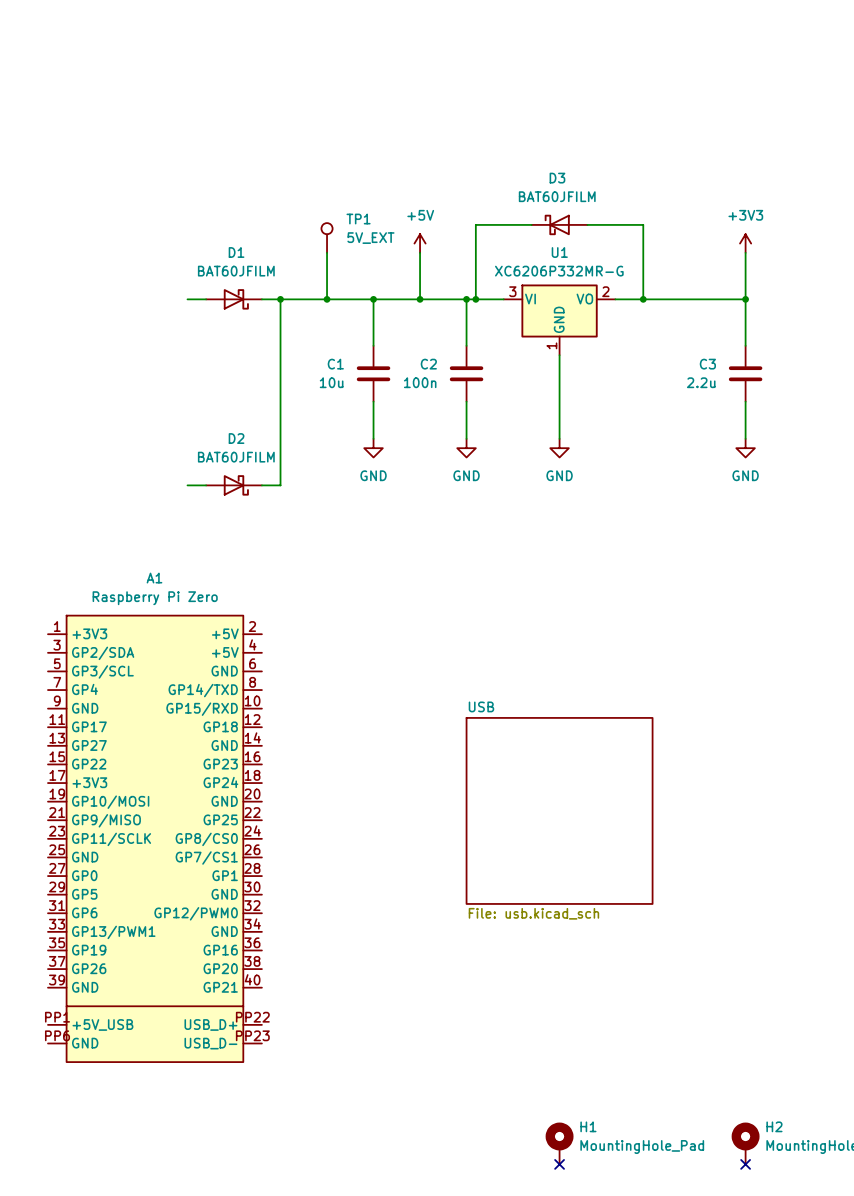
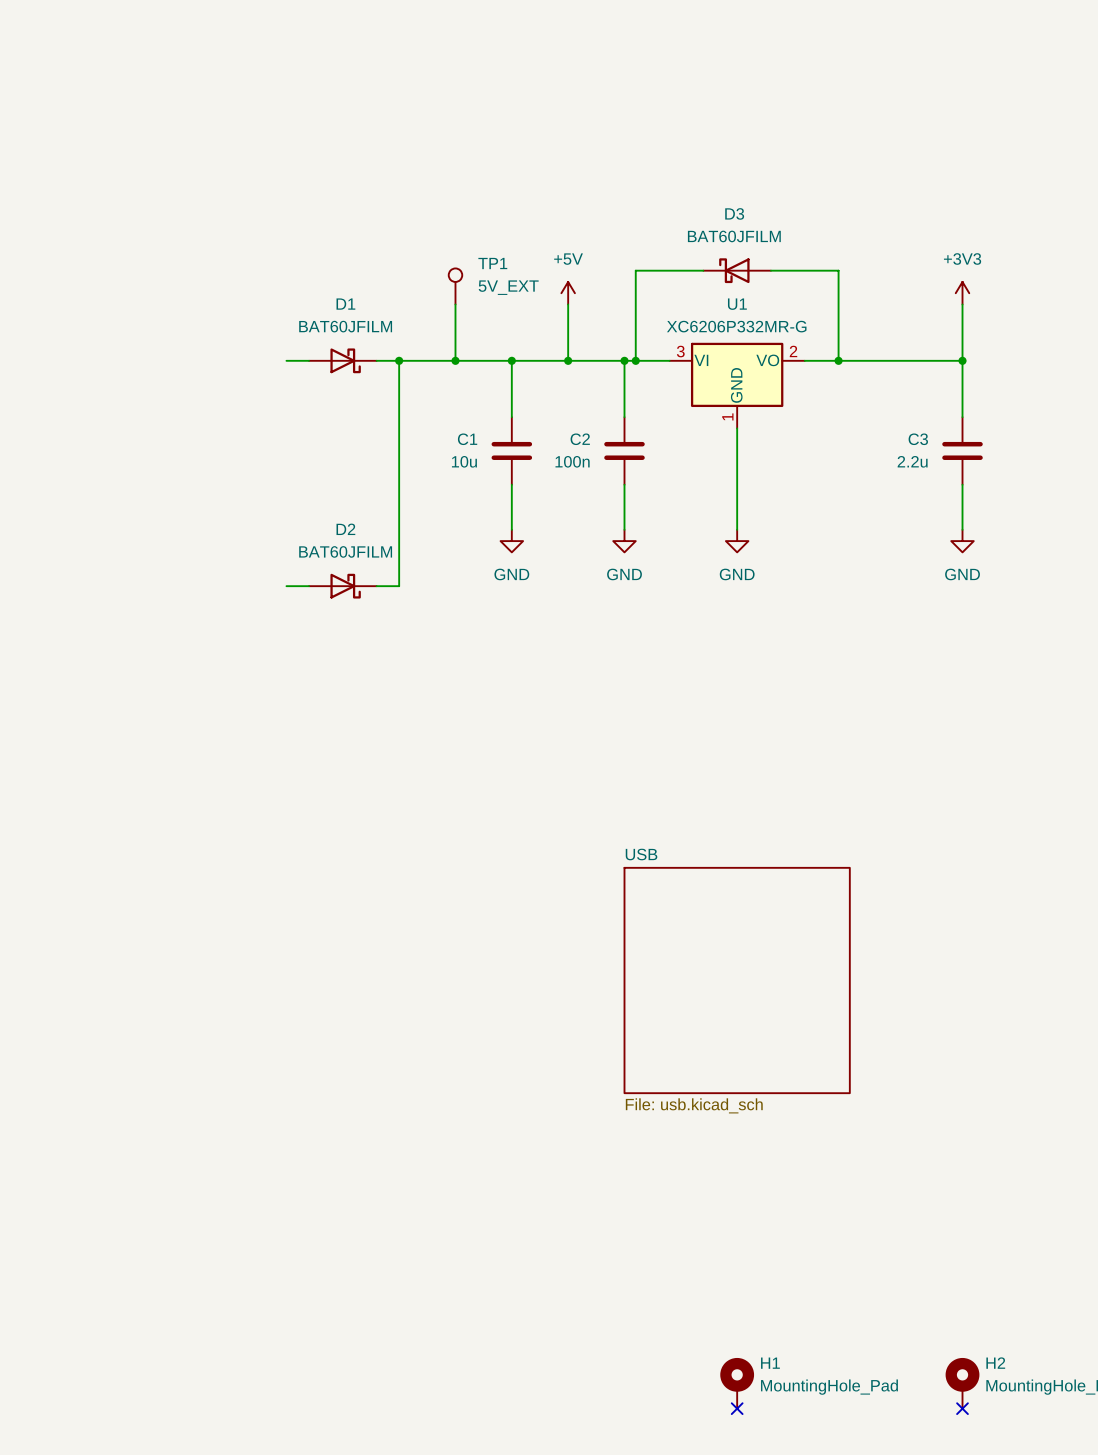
A1: Raspberry Pi Zero (154, 838) -> none

